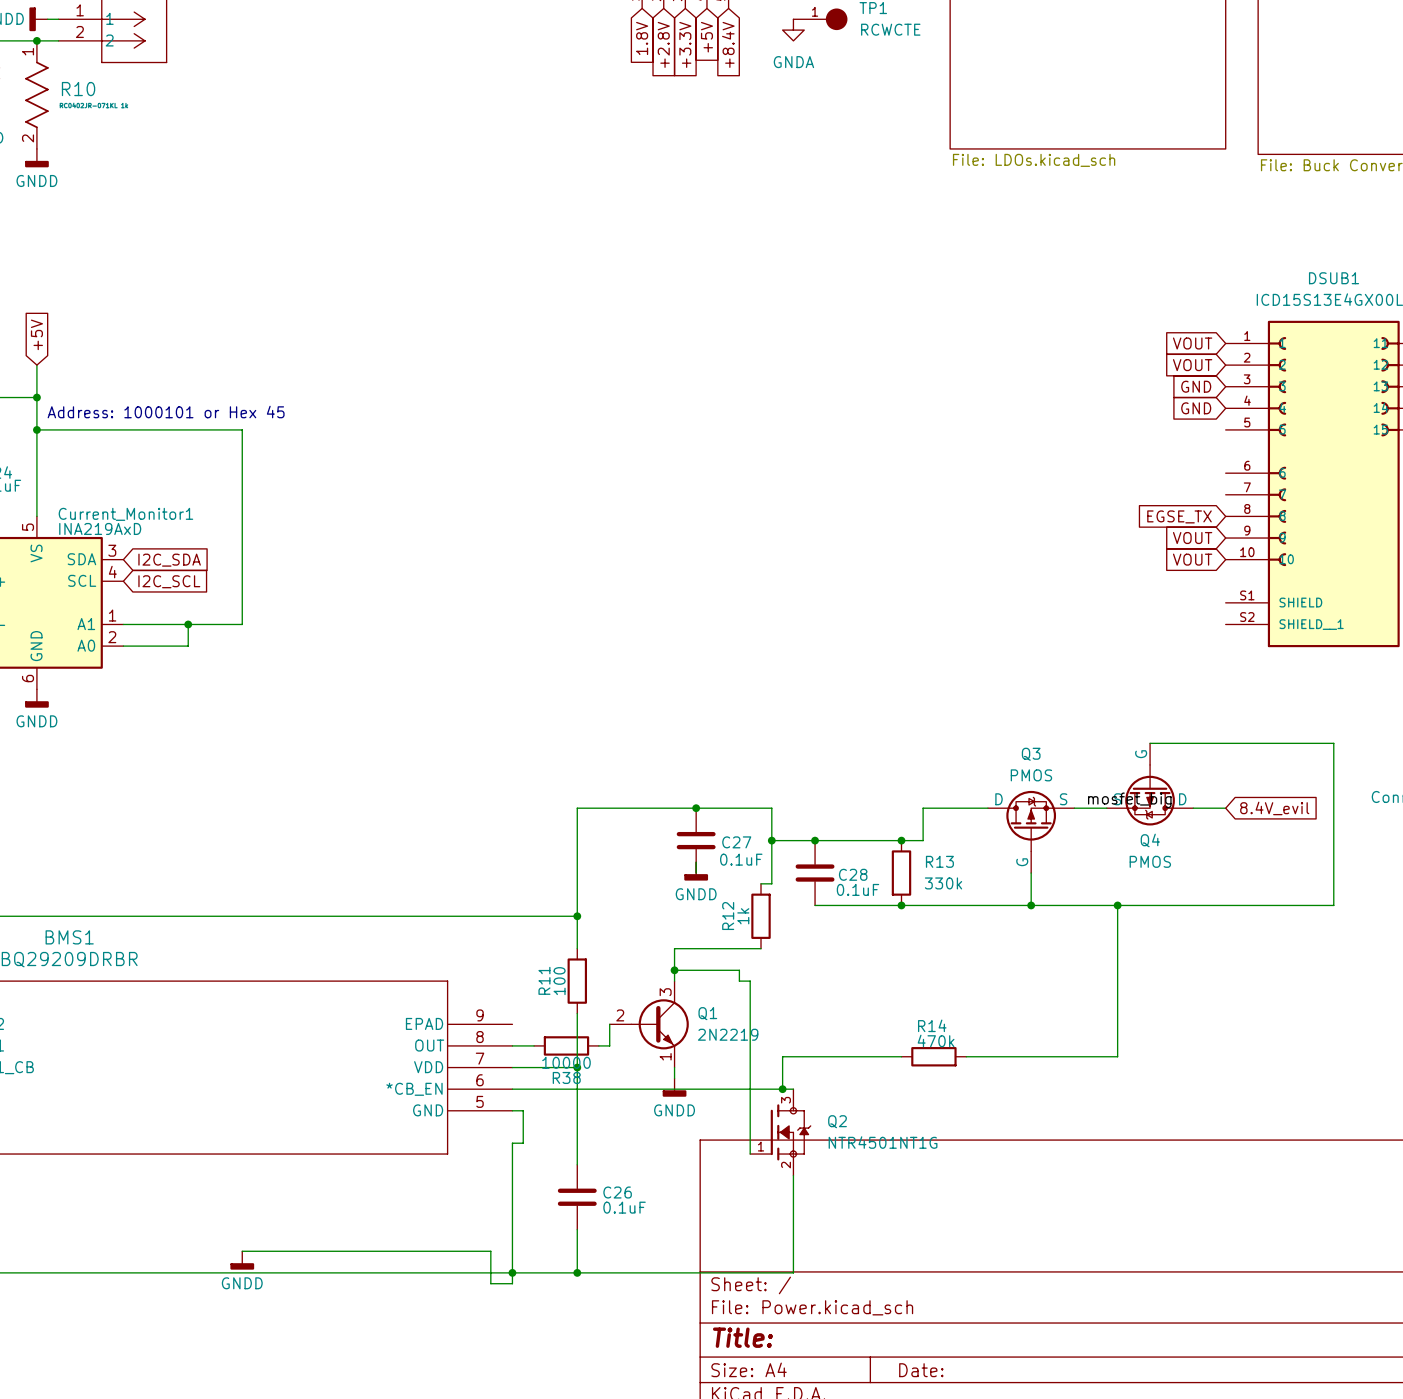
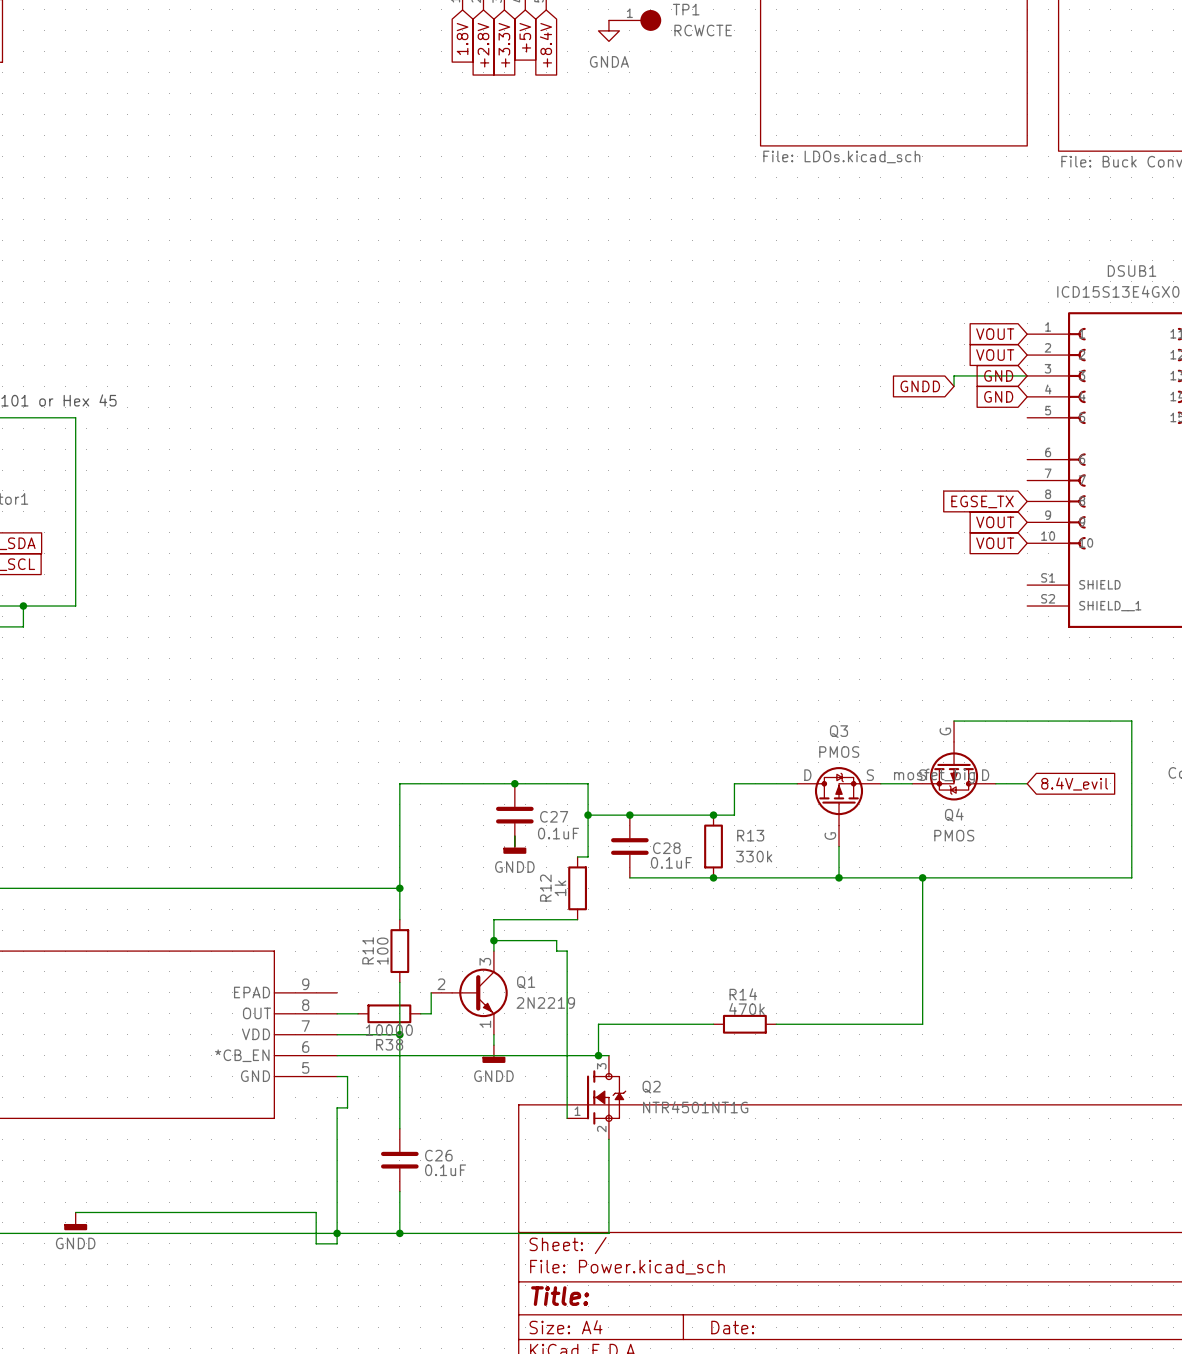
wire: none -> (1027, 375) (954, 375) (954, 386)
global label: none -> GNDD (920, 386)

